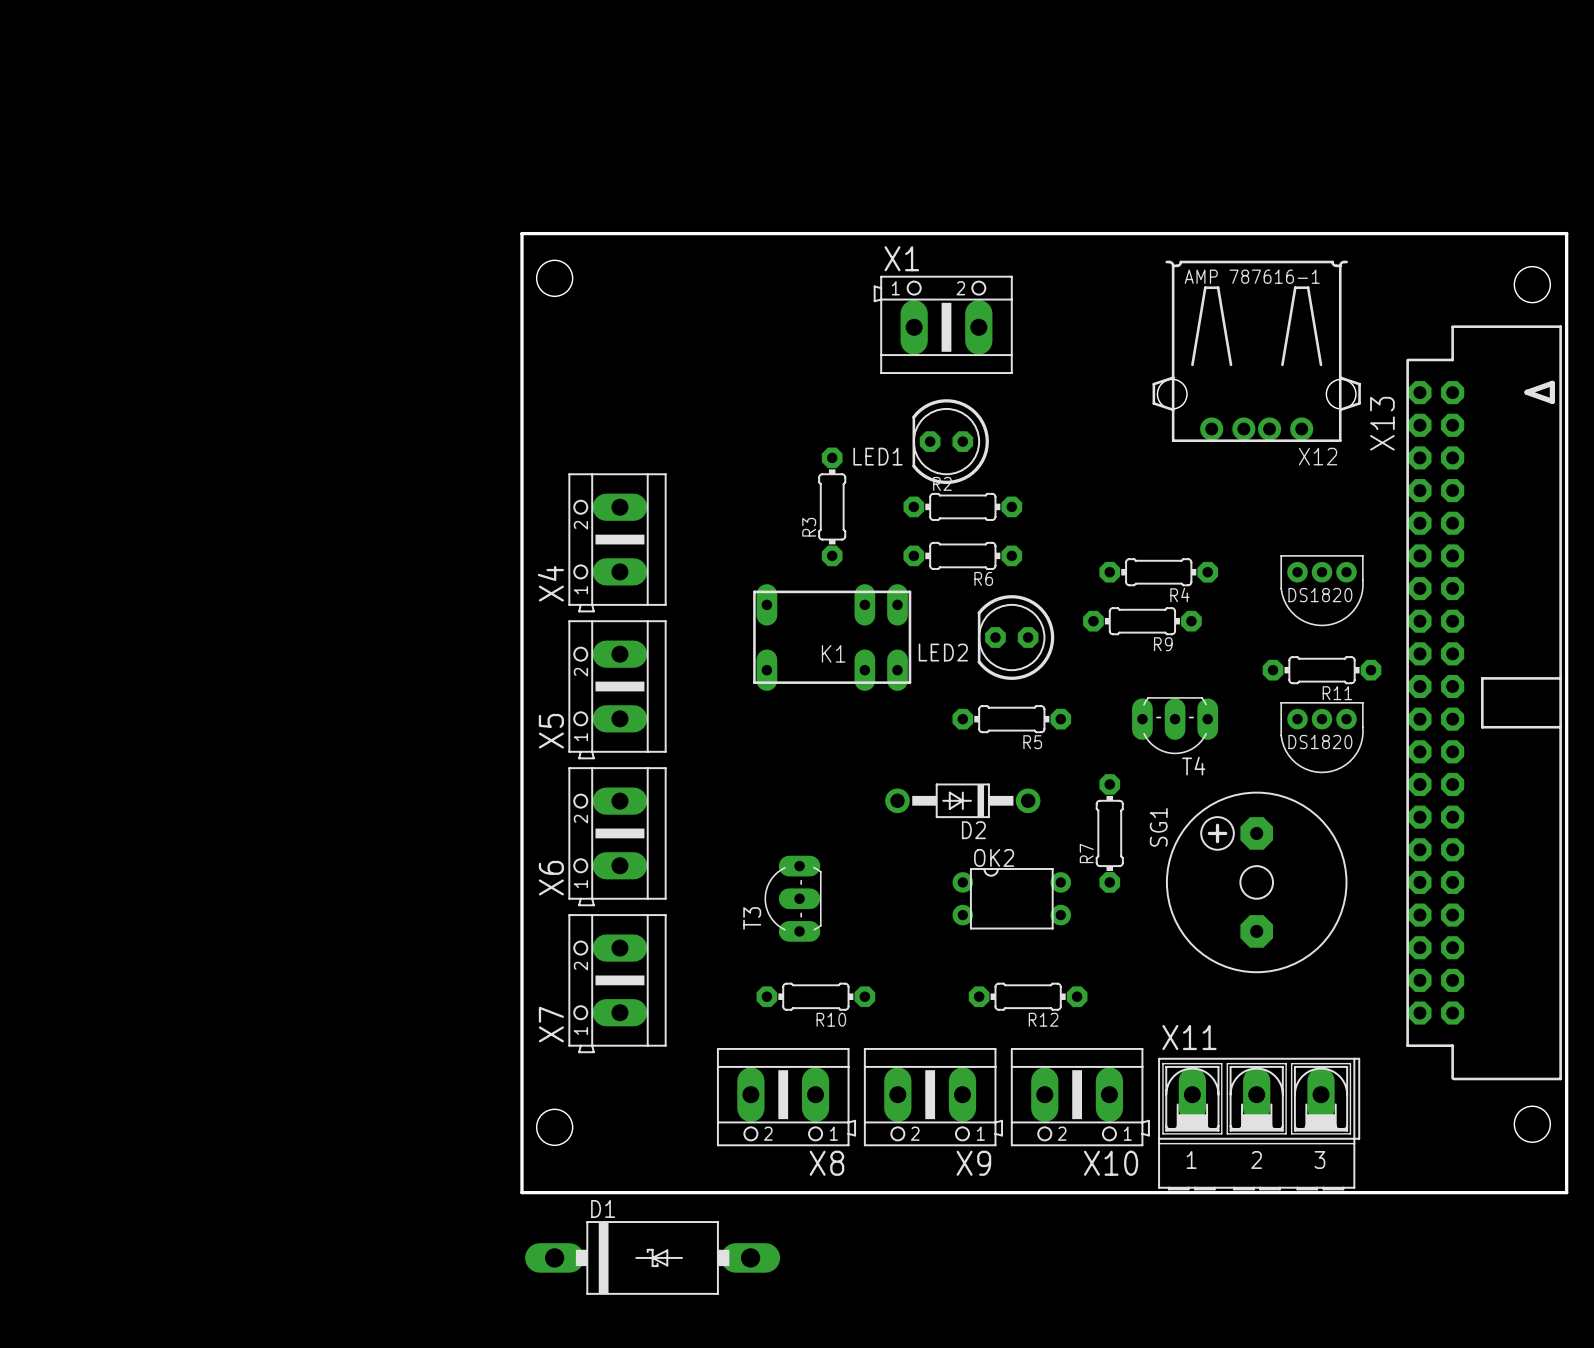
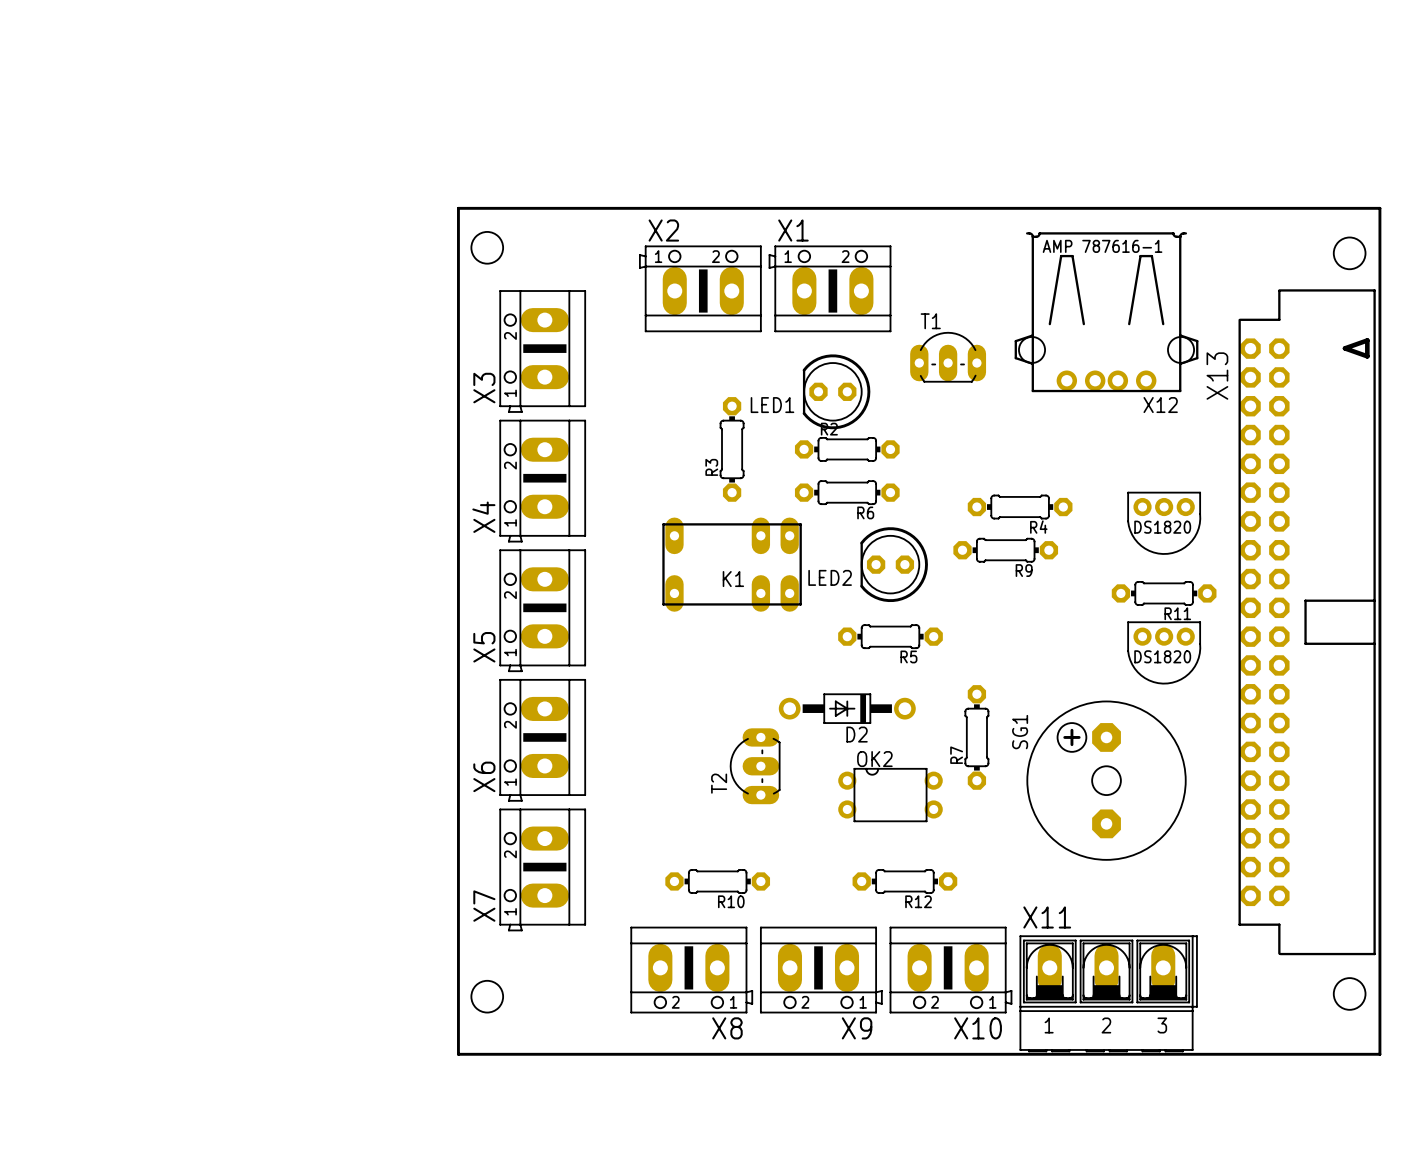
X2: none -> (700, 288)
X3: none -> (542, 351)
T1: none -> (948, 357)
T4: (1175, 725) -> none
T2: none -> (755, 766)
T3: (793, 898) -> none
D1: (652, 1257) -> none

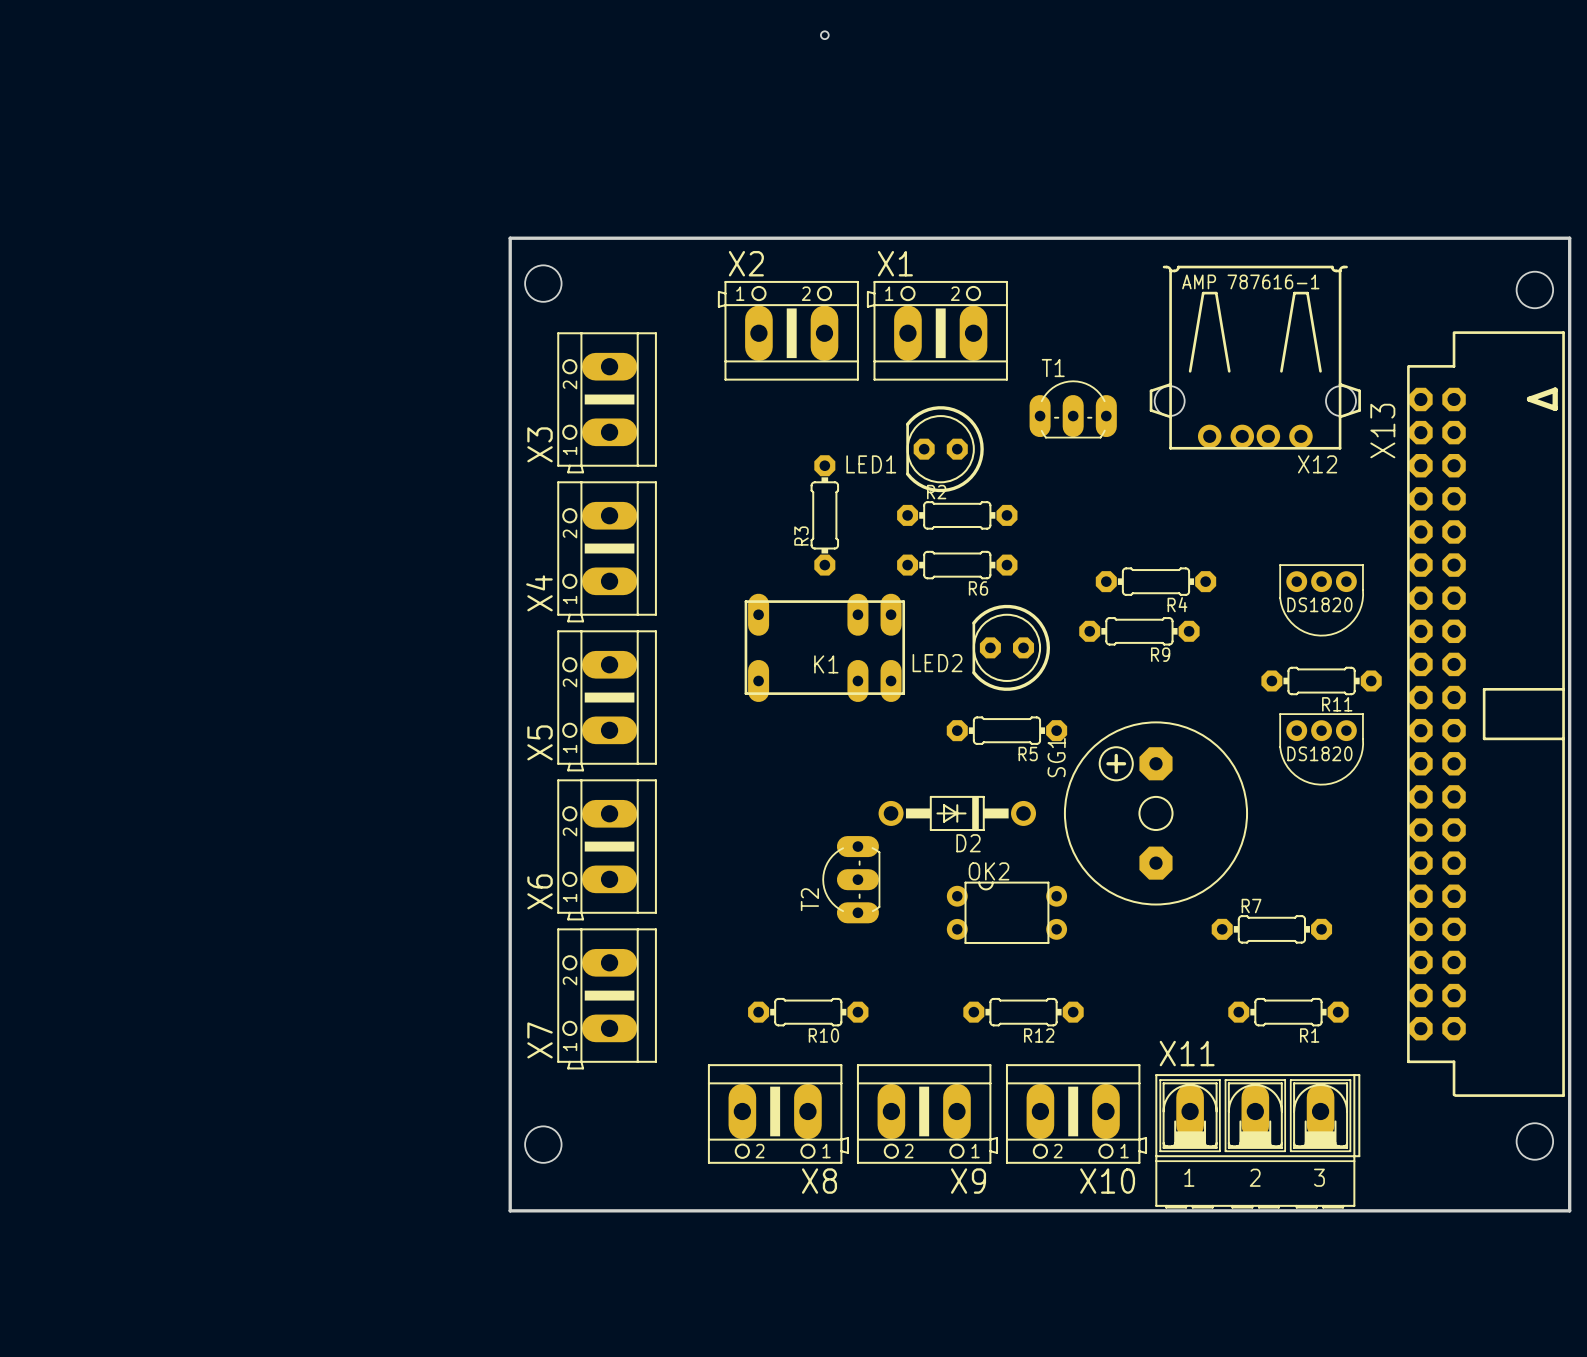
hole: none -> (824, 35)
R7 rotation: 0° (976, 737) -> 90° clockwise (1271, 929)
R7 position: (976, 737) -> (1271, 929)
SG1 position: (1106, 780) -> (1155, 813)
R1: none -> (1288, 1012)

